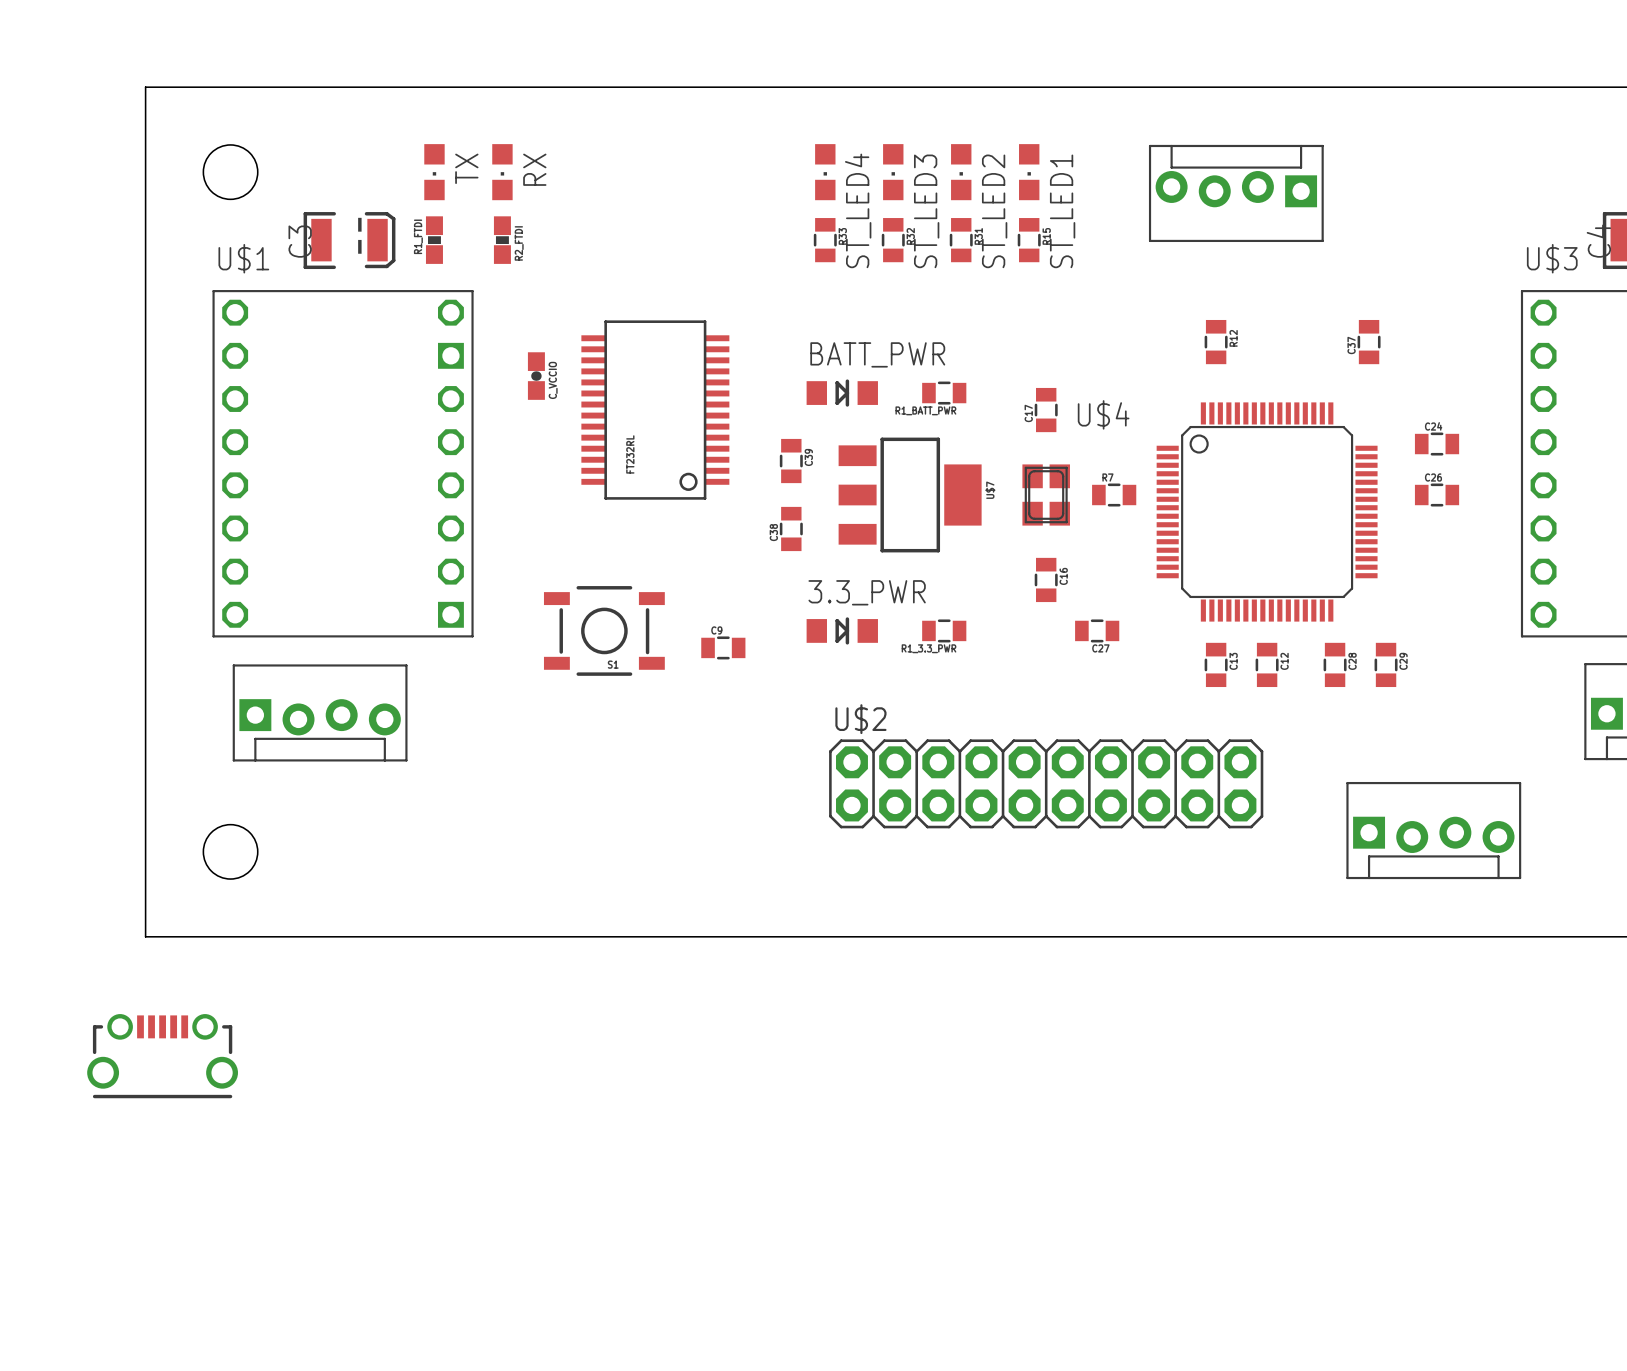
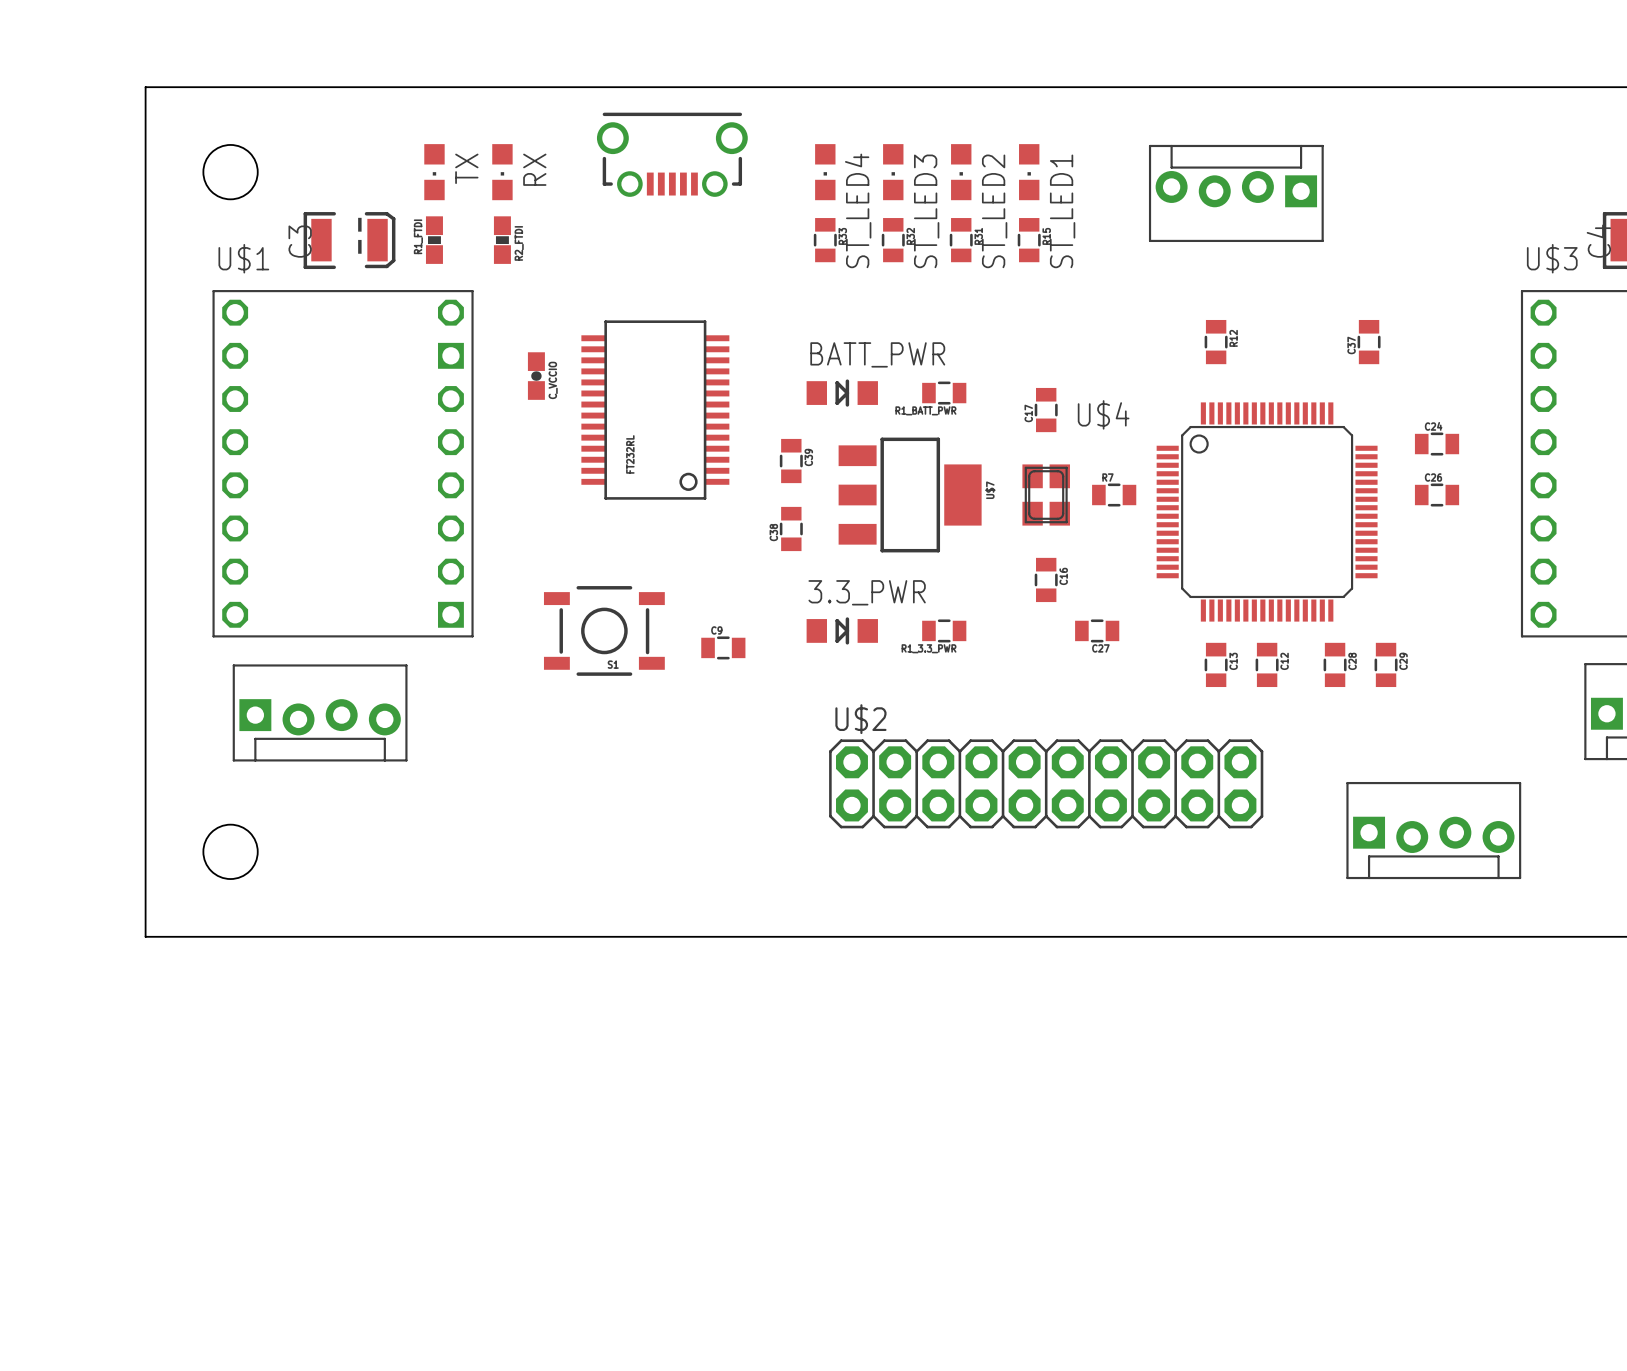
part: none -> (672, 154)
part: (162, 1056) -> none

